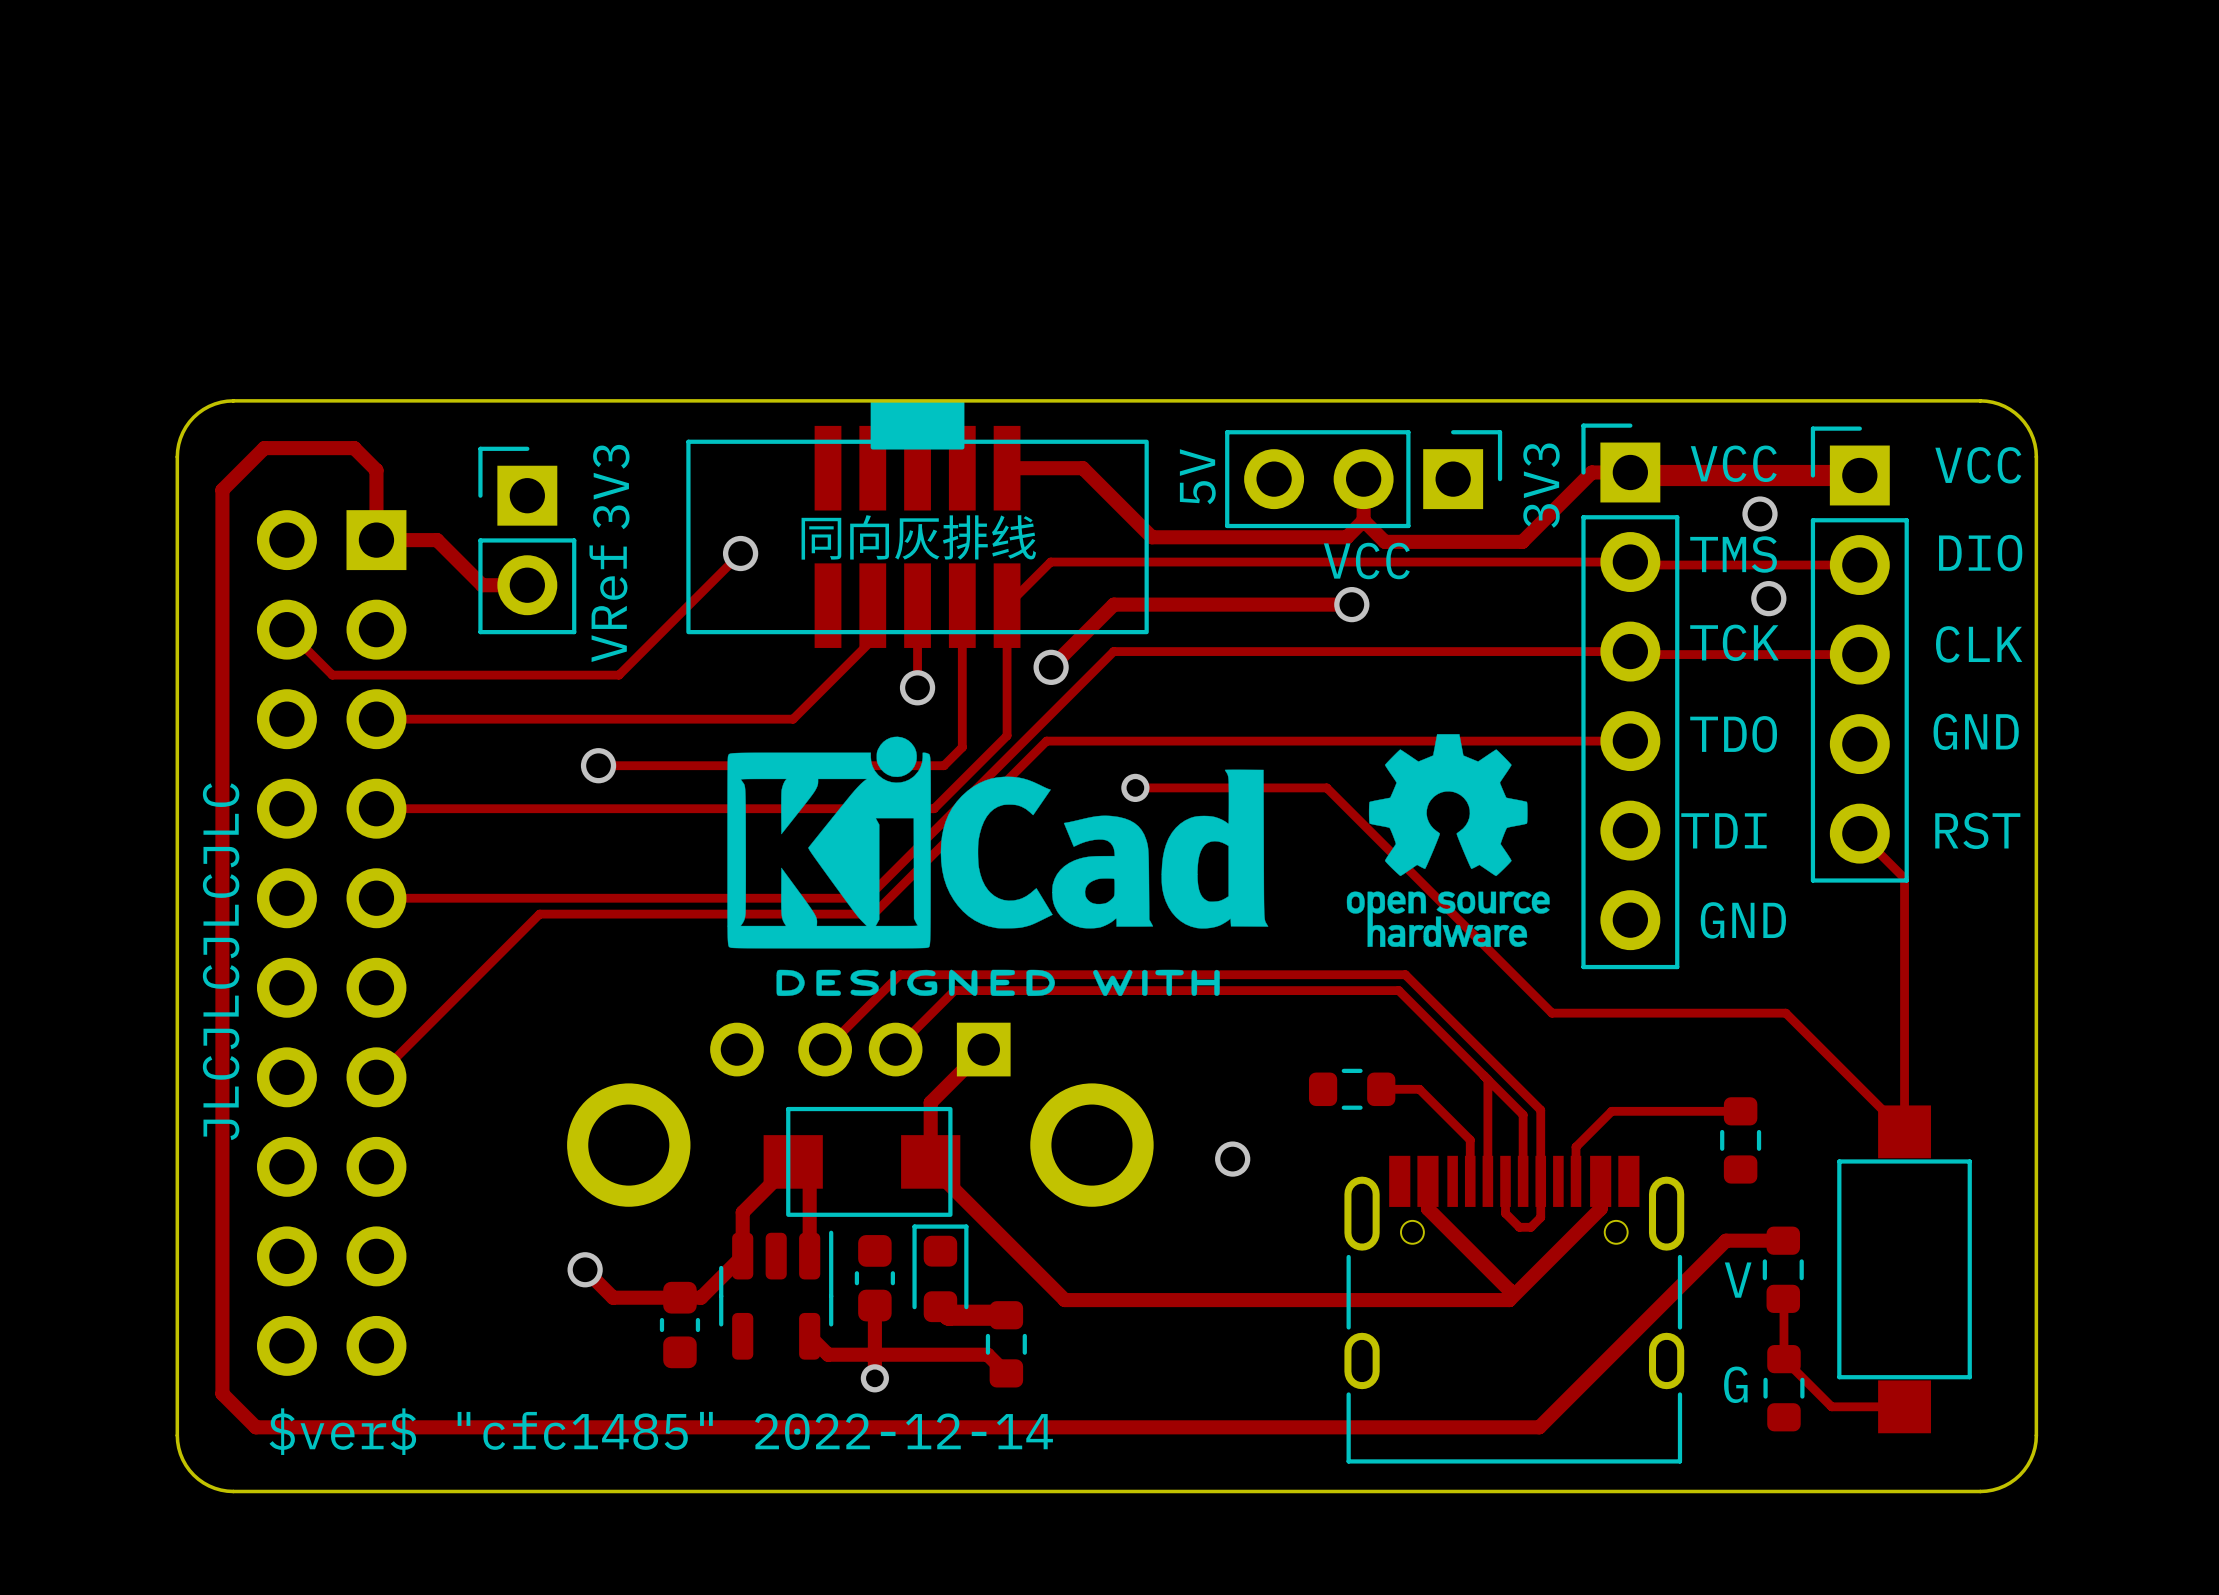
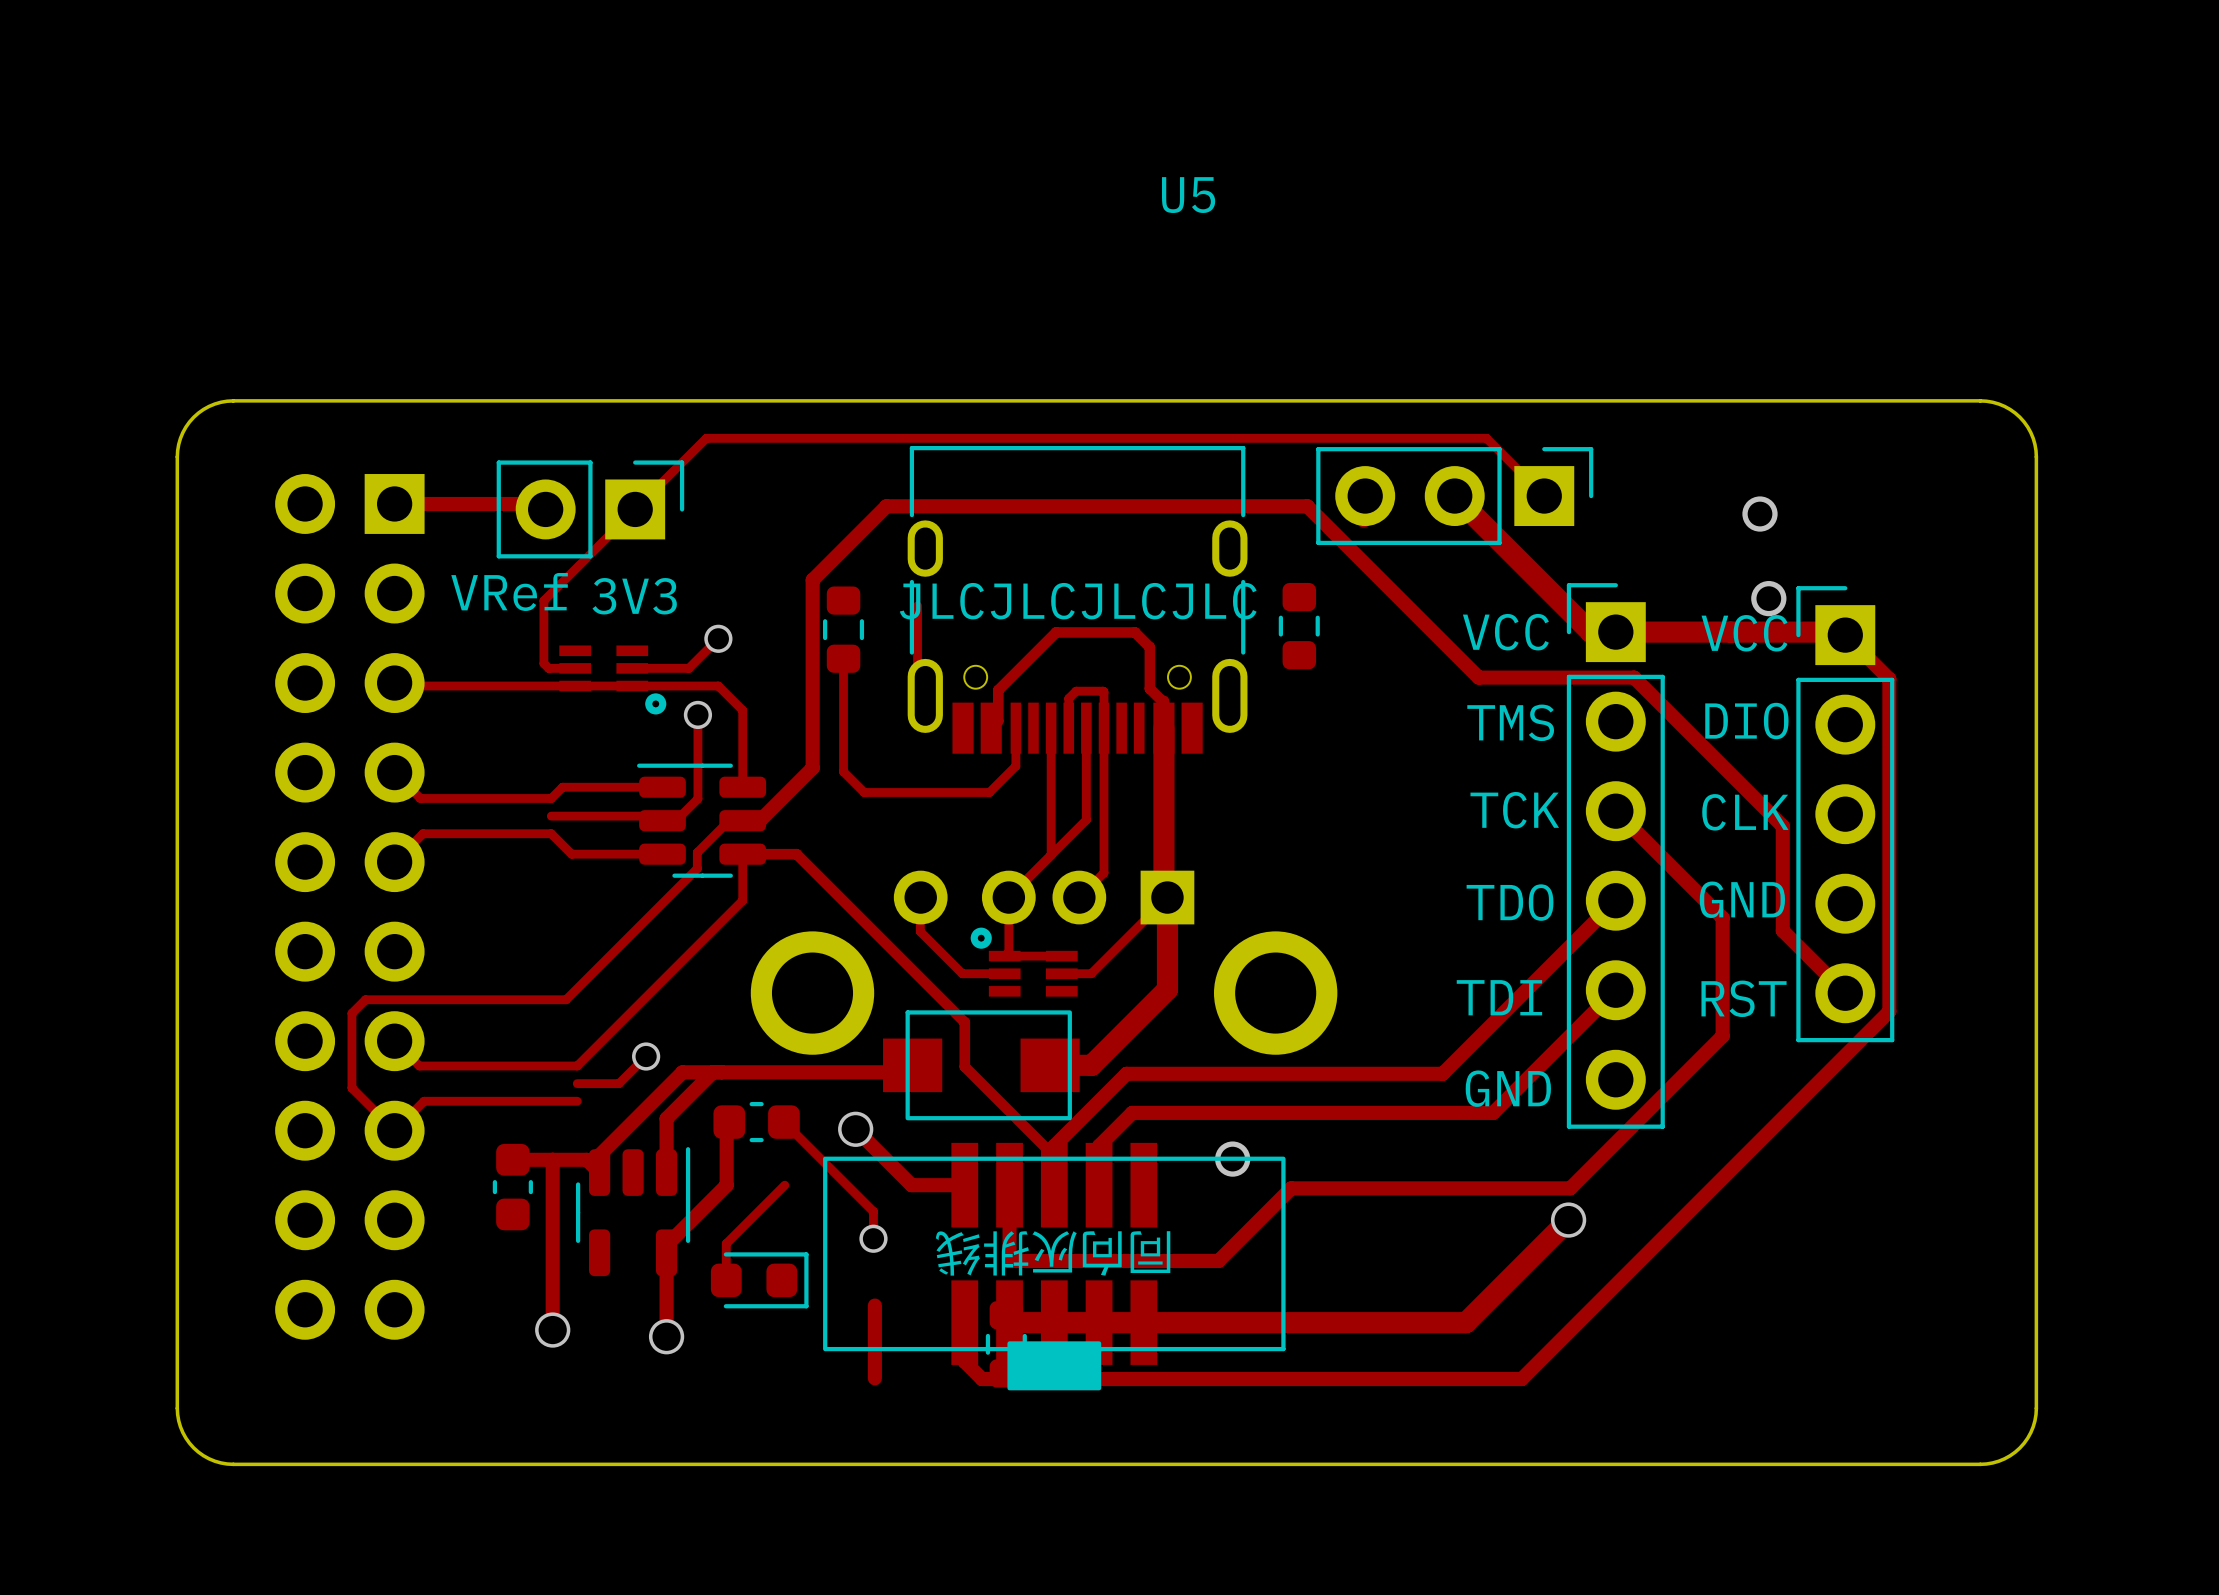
text: VCC (1733, 463) -> none
text: VCC (1978, 465) -> none
track: (1007, 468) (1082, 468) (1151, 537) (1346, 537) (1363, 520) (1384, 541) (1522, 541) (1591, 472) (1630, 472) (1633, 475) (1859, 475) -> none
text: 5V (1197, 476) -> none
part position: (1363, 479) -> (1454, 496)
text: 3V3 (1541, 485) -> none
text rotation: 0° (611, 487) -> 90° clockwise (634, 596)
track: none -> (1454, 496) (1590, 632) (1842, 632) (1889, 679) (1889, 1011) (1521, 1379) (982, 1379) (964, 1361) (964, 1322)
track: none -> (1544, 496) (1486, 438) (706, 438) (543, 600) (543, 663) (548, 668) (575, 668)
track: none -> (394, 503) (540, 503) (545, 509)
part rotation: 0° (917, 524) -> 180° (1054, 1266)
part position: (917, 524) -> (1054, 1266)
part rotation: 0° (527, 540) -> 90° clockwise (590, 509)
track: (740, 553) (618, 675) (332, 675) (286, 629) -> none
via: (740, 553) -> none
text position: DIO (1980, 553) -> DIO (1746, 721)
text position: TMS (1733, 554) -> TMS (1510, 722)
text: VCC (1366, 561) -> none
track: (1859, 565) (1633, 565) (1630, 562) (1050, 562) (1007, 605) (1007, 735) (934, 808) (376, 808) -> none
track: (527, 585) (482, 585) (437, 540) (376, 540) (376, 470) (354, 448) (264, 448) (222, 490) (222, 1393) (255, 1427) (1539, 1427) (1725, 1240) (1783, 1240) -> none
text: none -> JLCJLCJLCJLC (1078, 601)
text rotation: 0° (608, 603) -> 90° clockwise (509, 591)
track: (1351, 604) (1113, 604) (1051, 667) -> none
via: (1351, 604) -> none
track: (872, 605) (872, 639) (793, 719) (376, 719) -> none
track: (962, 605) (962, 747) (943, 765) (598, 765) -> none
part: none -> (1299, 626)
part: none -> (843, 629)
text: none -> VCC (1505, 632)
text: none -> VCC (1744, 633)
track: none -> (718, 638) (688, 668) (632, 668)
via: none -> (718, 638)
text position: TCK (1734, 642) -> TCK (1514, 810)
text position: CLK (1979, 644) -> CLK (1745, 812)
track: (1859, 654) (1633, 654) (1630, 651) (1113, 651) (867, 898) (376, 898) -> none
part position: (1859, 654) -> (1845, 814)
track: none -> (843, 658) (843, 771) (864, 792) (989, 792) (1015, 766) (1015, 728)
via: (1051, 667) -> none
part: none -> (612, 679)
track: none -> (394, 683) (397, 686) (718, 686) (742, 710) (742, 787)
via: (917, 687) -> none
part position: (1630, 696) -> (1615, 855)
track: none -> (1163, 700) (1163, 894) (1167, 897)
track: none -> (1163, 702) (1149, 688) (1149, 647) (1135, 632) (1056, 632) (998, 690) (998, 721) (991, 728)
track: none -> (697, 714) (697, 798) (676, 820) (662, 820) (657, 816) (551, 816)
via: none -> (697, 714)
track: none -> (1051, 728) (1051, 855)
track: none -> (1068, 728) (1068, 698) (1076, 691) (1103, 691) (1104, 872) (1079, 897)
track: none -> (1086, 728) (1086, 819) (1008, 897) (1008, 951) (1004, 956) (1061, 956)
text position: GND (1976, 731) -> GND (1508, 1088)
drawing: [1346, 734, 1550, 948] -> none
text position: TDO (1733, 734) -> TDO (1510, 902)
drawing: [727, 736, 1269, 997] -> none
track: (1630, 741) (1046, 741) (873, 914) (539, 914) (376, 1077) -> none
via: (598, 765) -> none
track: none -> (394, 772) (420, 798) (551, 798) (562, 787) (662, 787)
track: (1135, 787) (1326, 787) (1552, 1013) (1785, 1013) (1904, 1131) (1904, 878) (1859, 833) -> none
via: (1135, 787) -> none
track: none -> (1615, 811) (1722, 917) (1722, 1036) (1570, 1188) (1291, 1188) (1218, 1260) (1009, 1260) (1009, 1185)
part: none -> (701, 820)
text position: TDI (1723, 830) -> TDI (1499, 997)
text position: RST (1977, 830) -> RST (1744, 998)
track: none -> (662, 854) (571, 854) (551, 833) (422, 833) (394, 862)
track: none -> (920, 897) (920, 931) (962, 973) (1004, 973)
track: none -> (1167, 897) (1091, 973) (1061, 973)
track: none -> (1167, 897) (1167, 989) (1091, 1065) (1050, 1065)
track: none -> (1615, 900) (1442, 1073) (1126, 1073) (1054, 1146) (1054, 1185) (1054, 1156) (964, 1066) (964, 1022) (796, 854) (742, 854) (742, 900) (577, 1065) (419, 1065) (394, 1041)
text position: GND (1743, 920) -> GND (1742, 899)
part position: (331, 943) -> (349, 906)
text: JLCJLCJLCJLC (221, 961) -> none
U5: none -> (1024, 962)
track: none -> (1615, 990) (1493, 1112) (1132, 1112) (1099, 1146) (1099, 1185)
track: none -> (1845, 993) (1782, 930) (1782, 826) (1634, 677) (1478, 677) (1307, 506) (886, 506) (812, 580) (812, 768) (759, 820) (729, 820) (697, 852) (697, 868) (566, 999) (365, 999) (351, 1013) (351, 1088) (394, 1130) (424, 1101) (577, 1101)
track: (825, 1049) (899, 974) (1405, 974) (1540, 1110) (1540, 1217) (1530, 1227) (1519, 1227) (1505, 1213) (1505, 1181) -> none
track: (895, 1049) (954, 990) (1398, 990) (1523, 1114) (1523, 1181) -> none
track: (983, 1049) (930, 1102) (930, 1165) (1064, 1300) (1509, 1300) -> none
track: none -> (646, 1055) (619, 1083) (577, 1083)
via: none -> (646, 1056)
track: none -> (912, 1065) (905, 1072) (682, 1072) (599, 1155) (599, 1172) (586, 1159) (512, 1159)
track: none -> (712, 1072) (666, 1118) (666, 1172)
track: (1487, 1079) (1487, 1181) -> none
part: (1352, 1089) -> none
track: (1381, 1089) (1419, 1089) (1470, 1140) (1470, 1181) -> none
track: (1740, 1111) (1611, 1111) (1576, 1147) (1576, 1181) -> none
part position: (860, 1114) -> (1044, 962)
track: none -> (729, 1122) (726, 1124) (726, 1185) (666, 1245) (666, 1336)
part: none -> (756, 1122)
track: none -> (783, 1122) (873, 1211) (873, 1238)
track: none -> (854, 1128) (911, 1185) (964, 1185)
via: none -> (855, 1129)
part: (1740, 1140) -> none
track: none -> (552, 1159) (552, 1330)
part position: (861, 1161) -> (981, 1065)
track: (1427, 1181) (1427, 1208) (1509, 1290) (1509, 1300) -> none
track: (1600, 1181) (1600, 1208) (1509, 1300) -> none
track: none -> (784, 1185) (726, 1243) (726, 1280)
part: none -> (512, 1187)
part: none -> (633, 1211)
track: none -> (1569, 1219) (1466, 1322) (1009, 1322)
via: none -> (1568, 1220)
part footprint: [719, 1230, 834, 1360] -> [710, 1252, 809, 1309]
via: none -> (873, 1238)
track: (809, 1256) (809, 1178) (793, 1161) (742, 1212) (742, 1256) (701, 1297) (613, 1297) (585, 1269) -> none
via: (585, 1269) -> none
part: (1783, 1269) -> none
part: (1904, 1269) -> none
part: (940, 1273) -> none
part: (874, 1278) -> none
text: V (1738, 1280) -> none
track: (1783, 1298) (1783, 1359) (1831, 1406) (1904, 1406) -> none
track: (940, 1306) (949, 1315) (1006, 1315) -> none
part rotation: 0° (1514, 1309) -> 180° (1077, 599)
part position: (1514, 1309) -> (1077, 599)
part: (679, 1325) -> none
via: none -> (552, 1330)
via: none -> (666, 1336)
track: (809, 1336) (828, 1354) (987, 1354) (1006, 1373) -> none
via: (874, 1378) -> none
text: G (1735, 1384) -> none
part: (1783, 1388) -> none
board edge: (177, 1408) (177, 1441) (185, 1465) (203, 1482) (220, 1490) (233, 1491) (1980, 1491) (1998, 1488) (2010, 1482) (2027, 1465) (2036, 1441) (2036, 1408) -> (177, 1408) (180, 1426) (193, 1447) (214, 1461) (233, 1464) (1980, 1464) (1998, 1461) (2019, 1447) (2033, 1426) (2036, 1408)
text: $ver$ "cfc1485" 2022-12-14 (661, 1431) -> none

